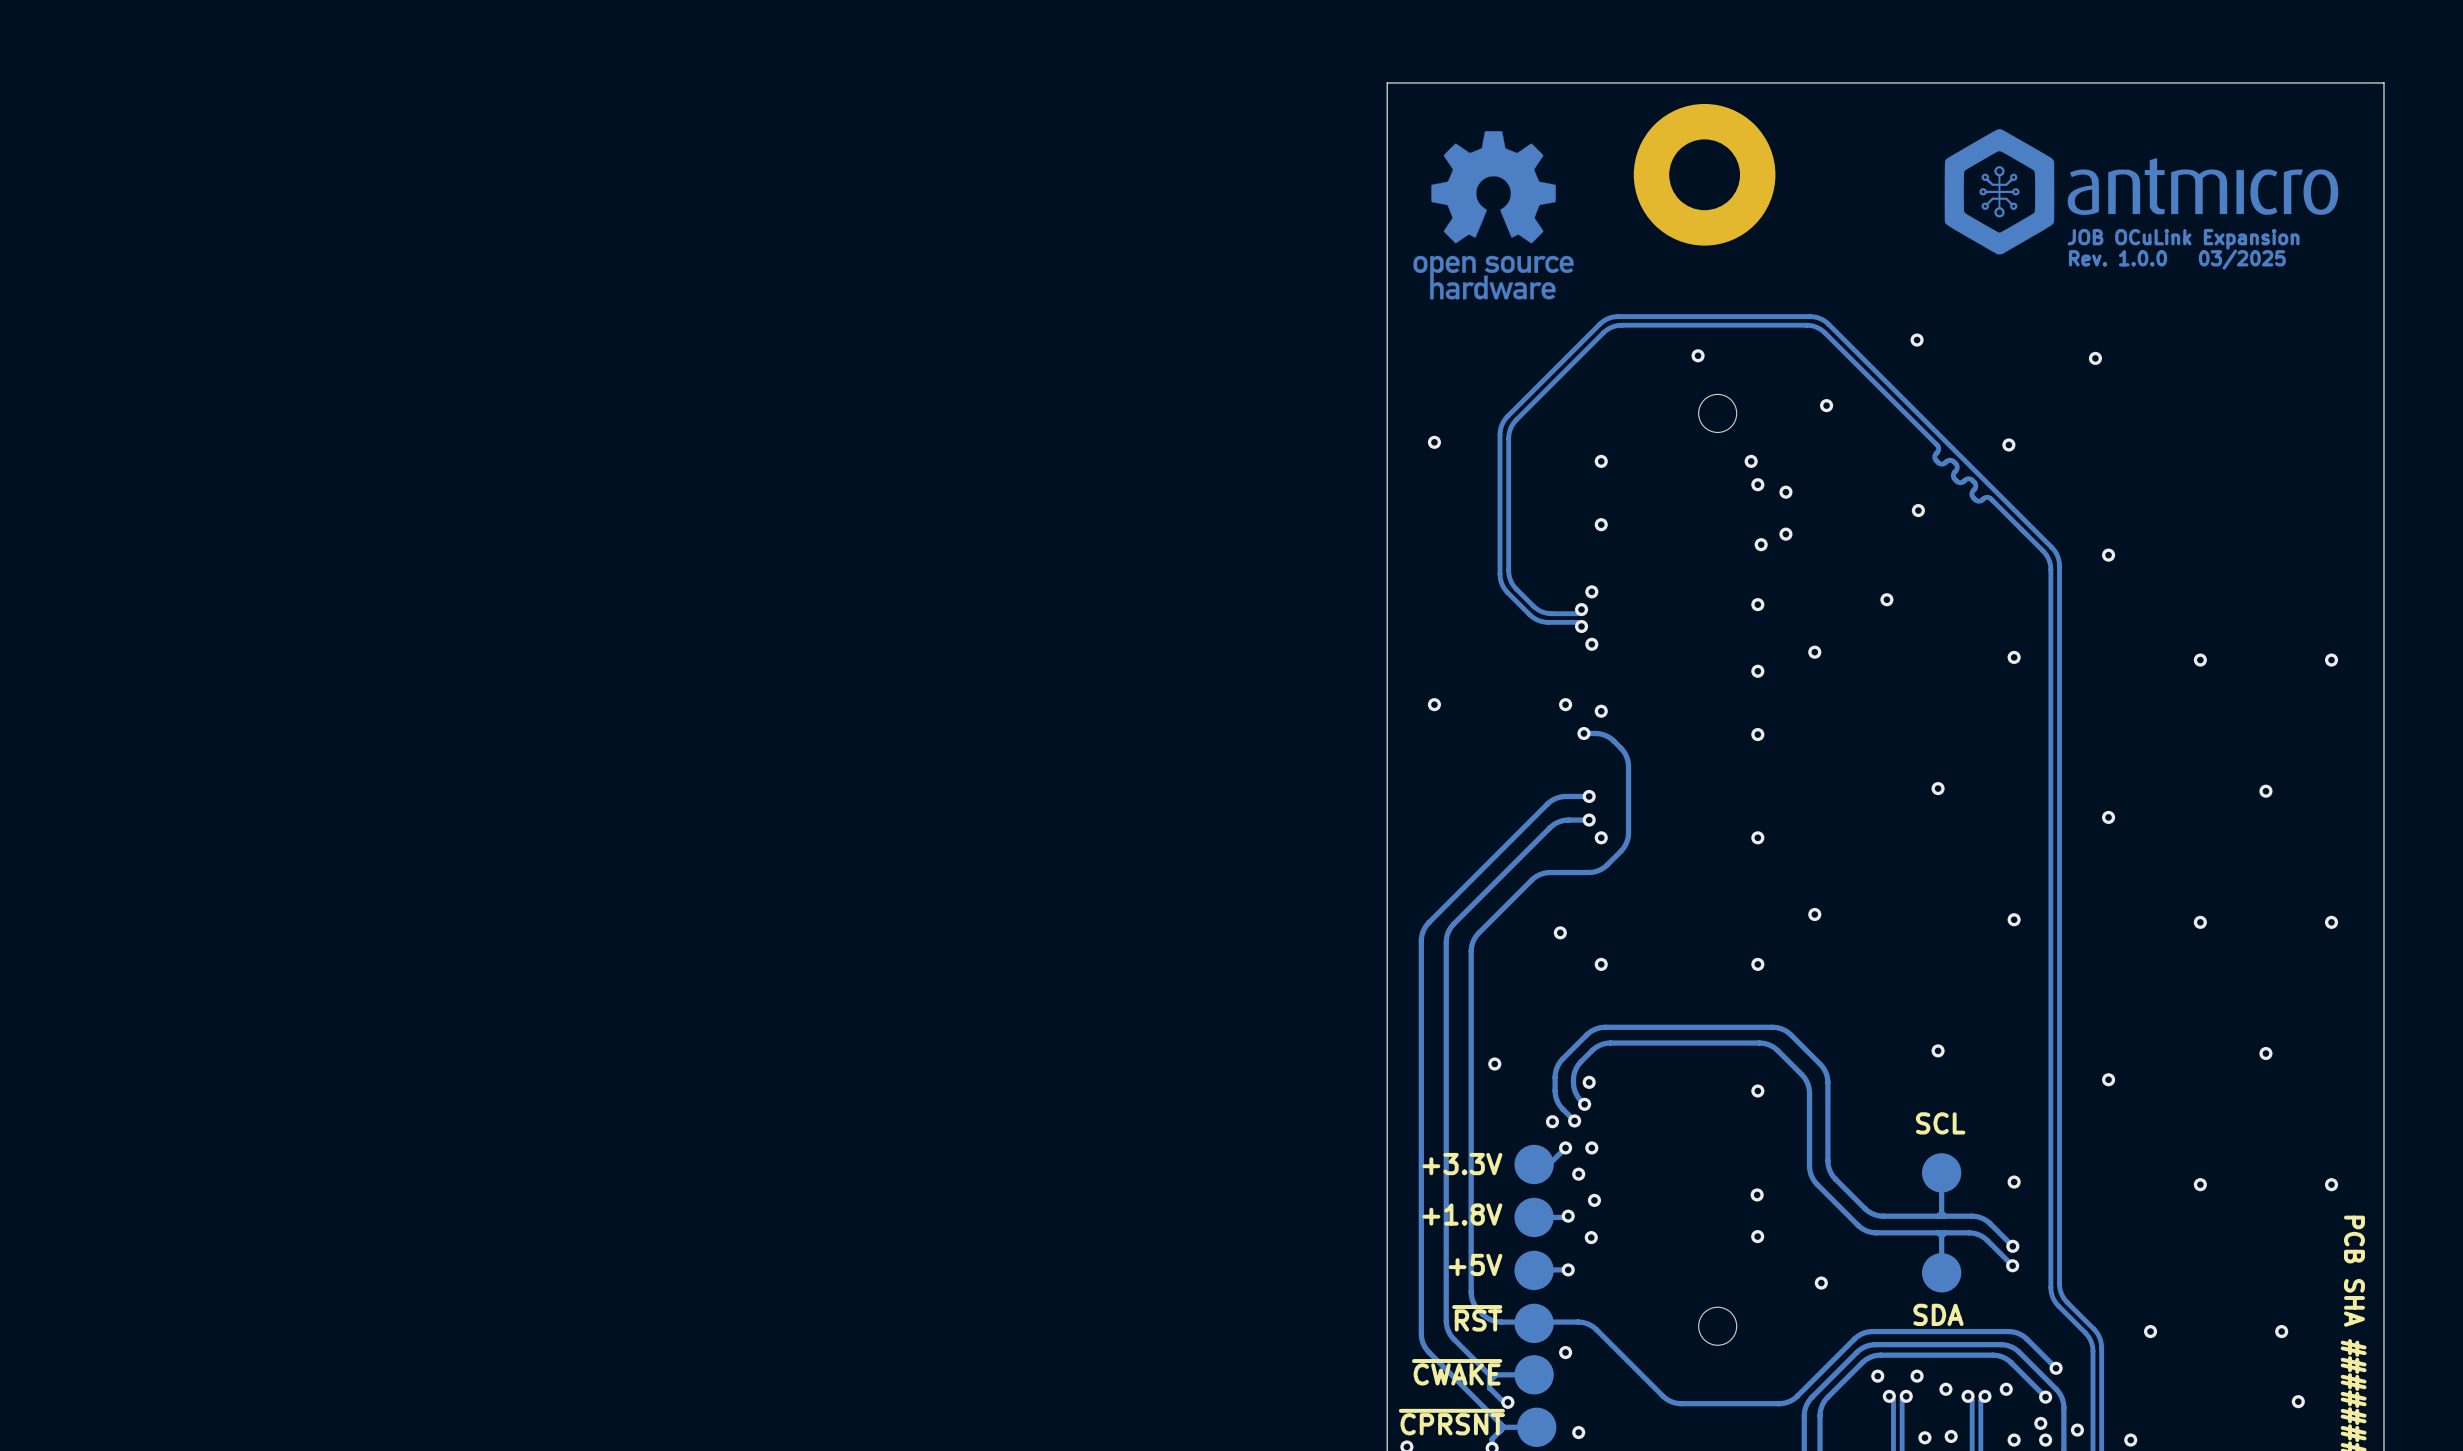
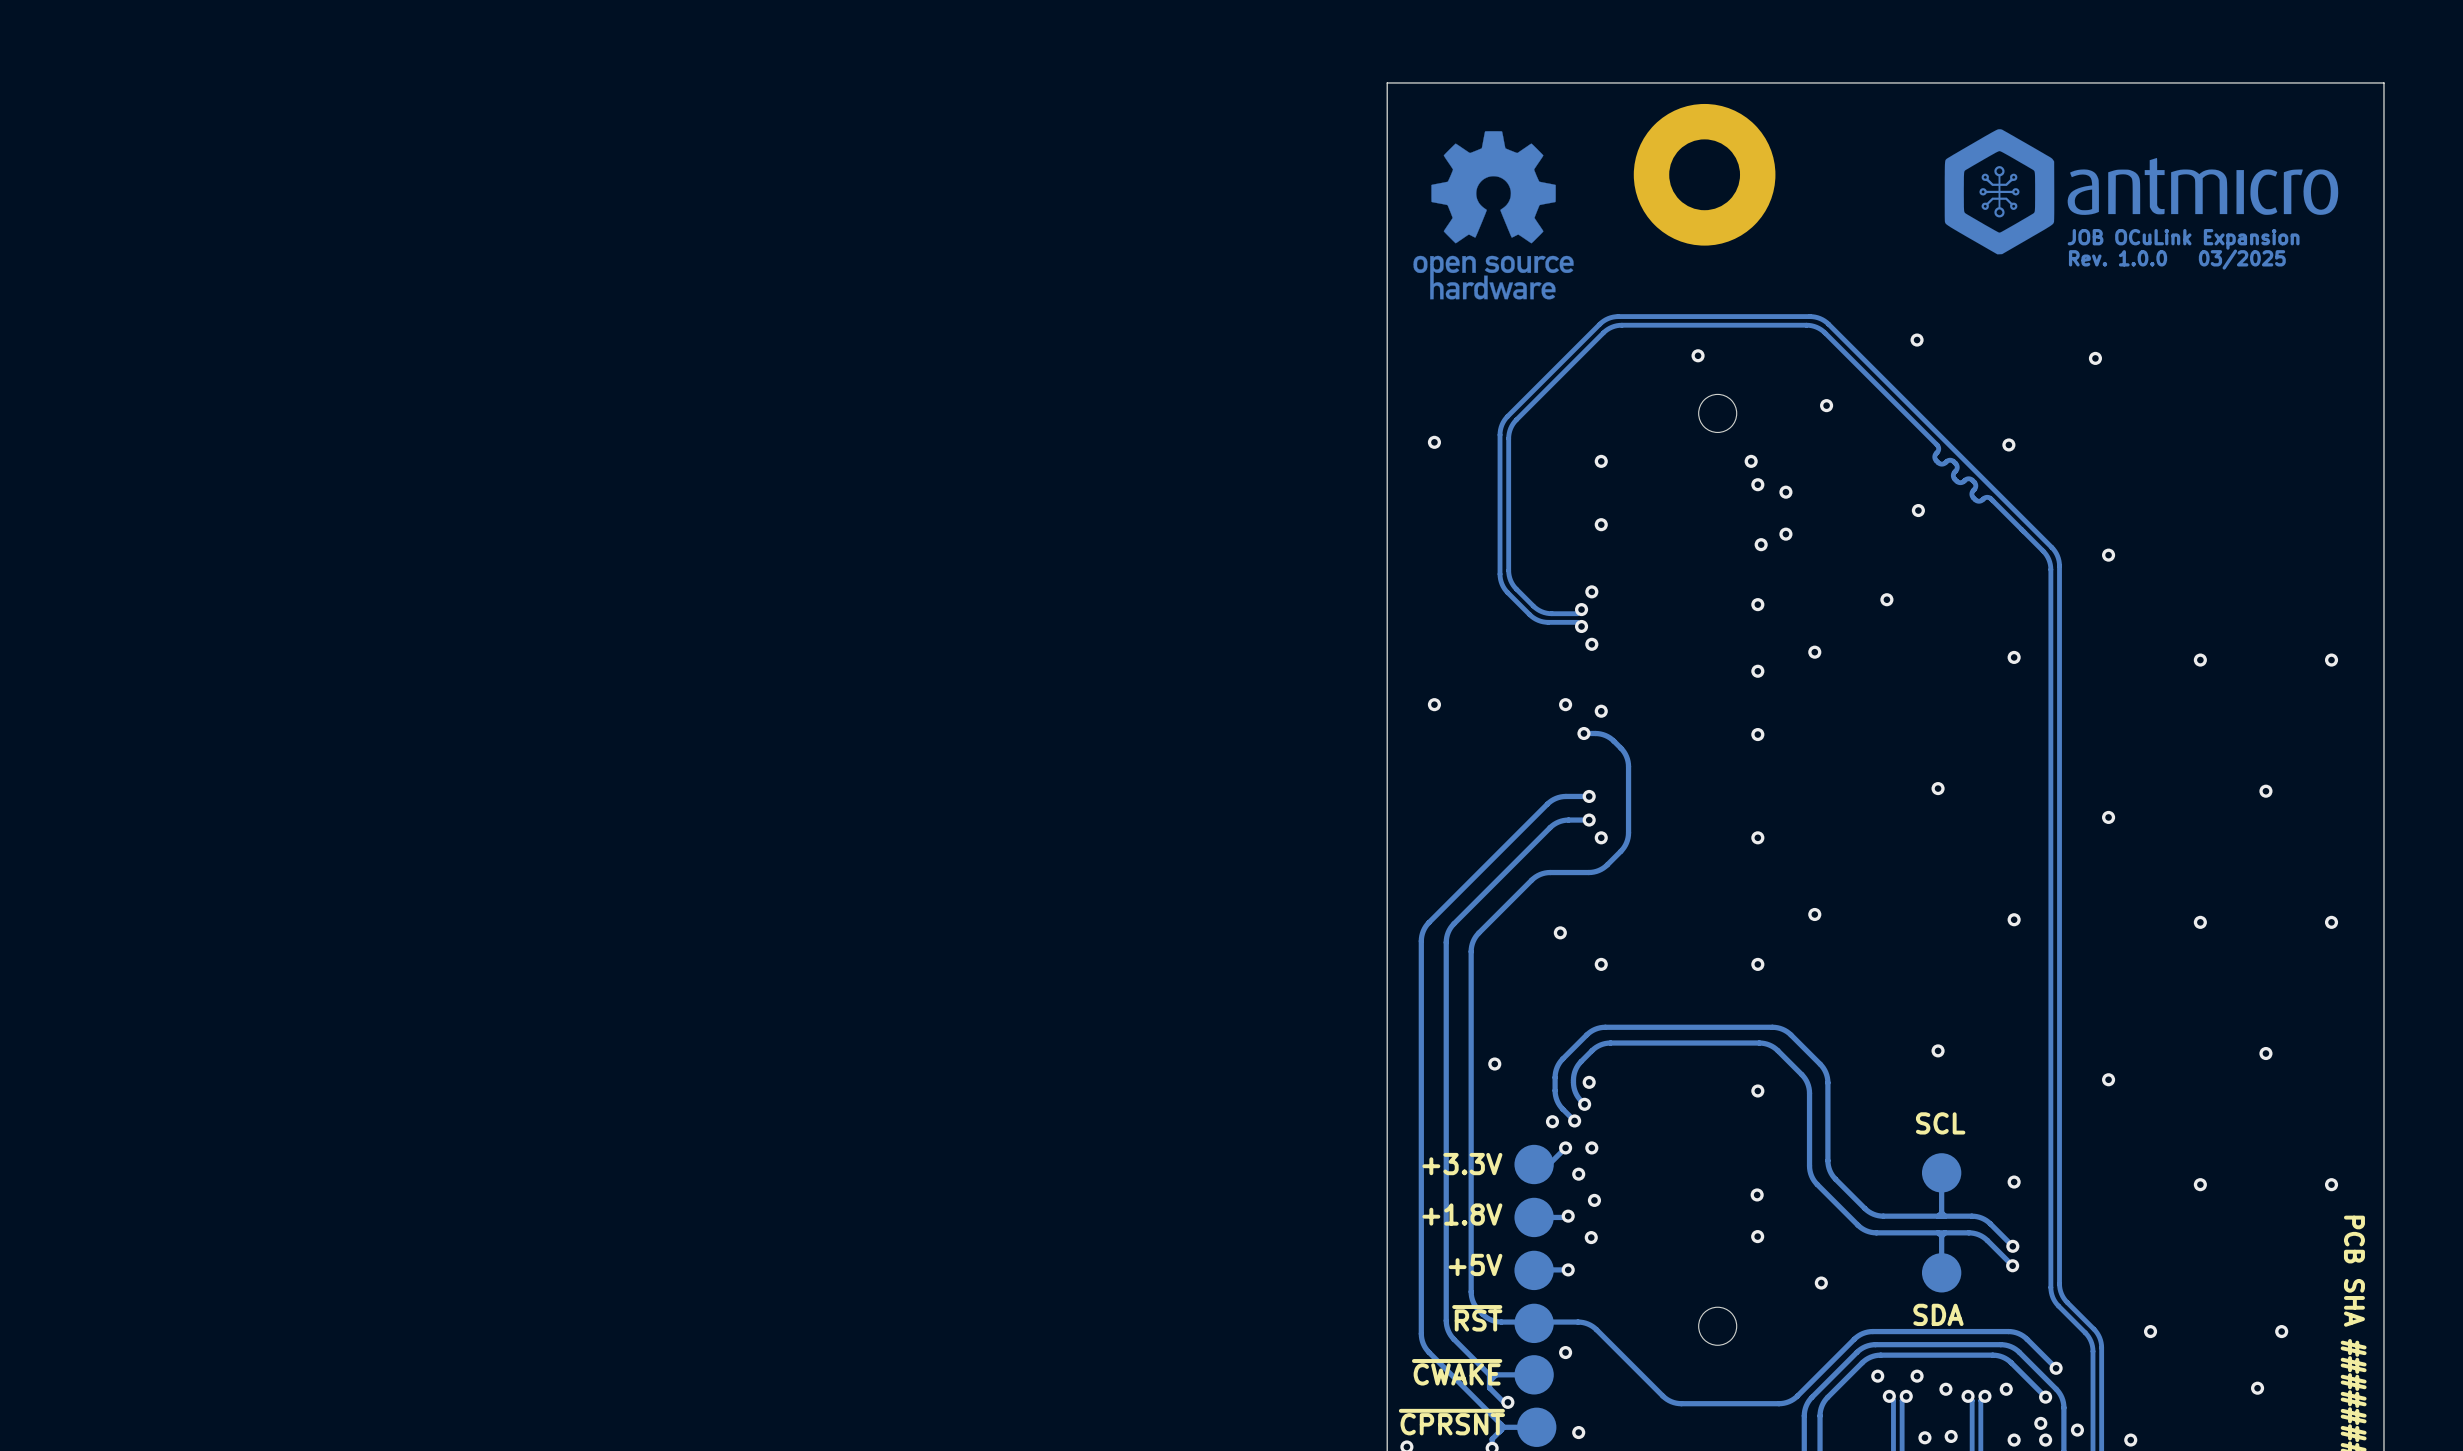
via position: (2298, 1401) -> (2257, 1388)

